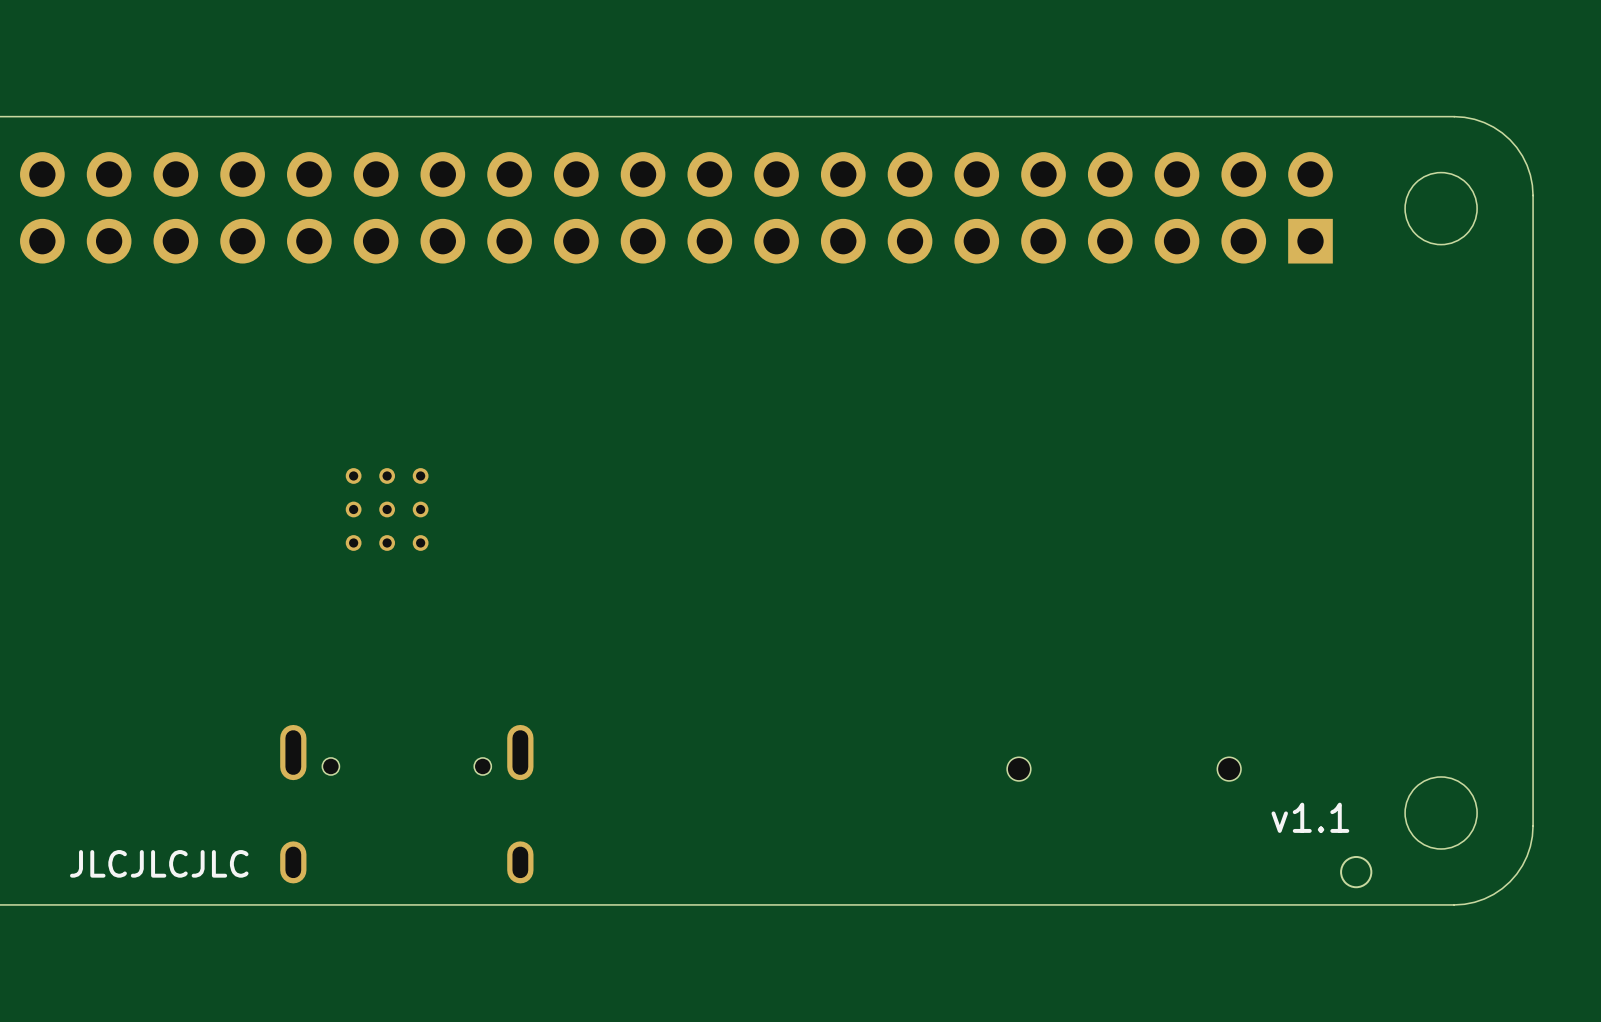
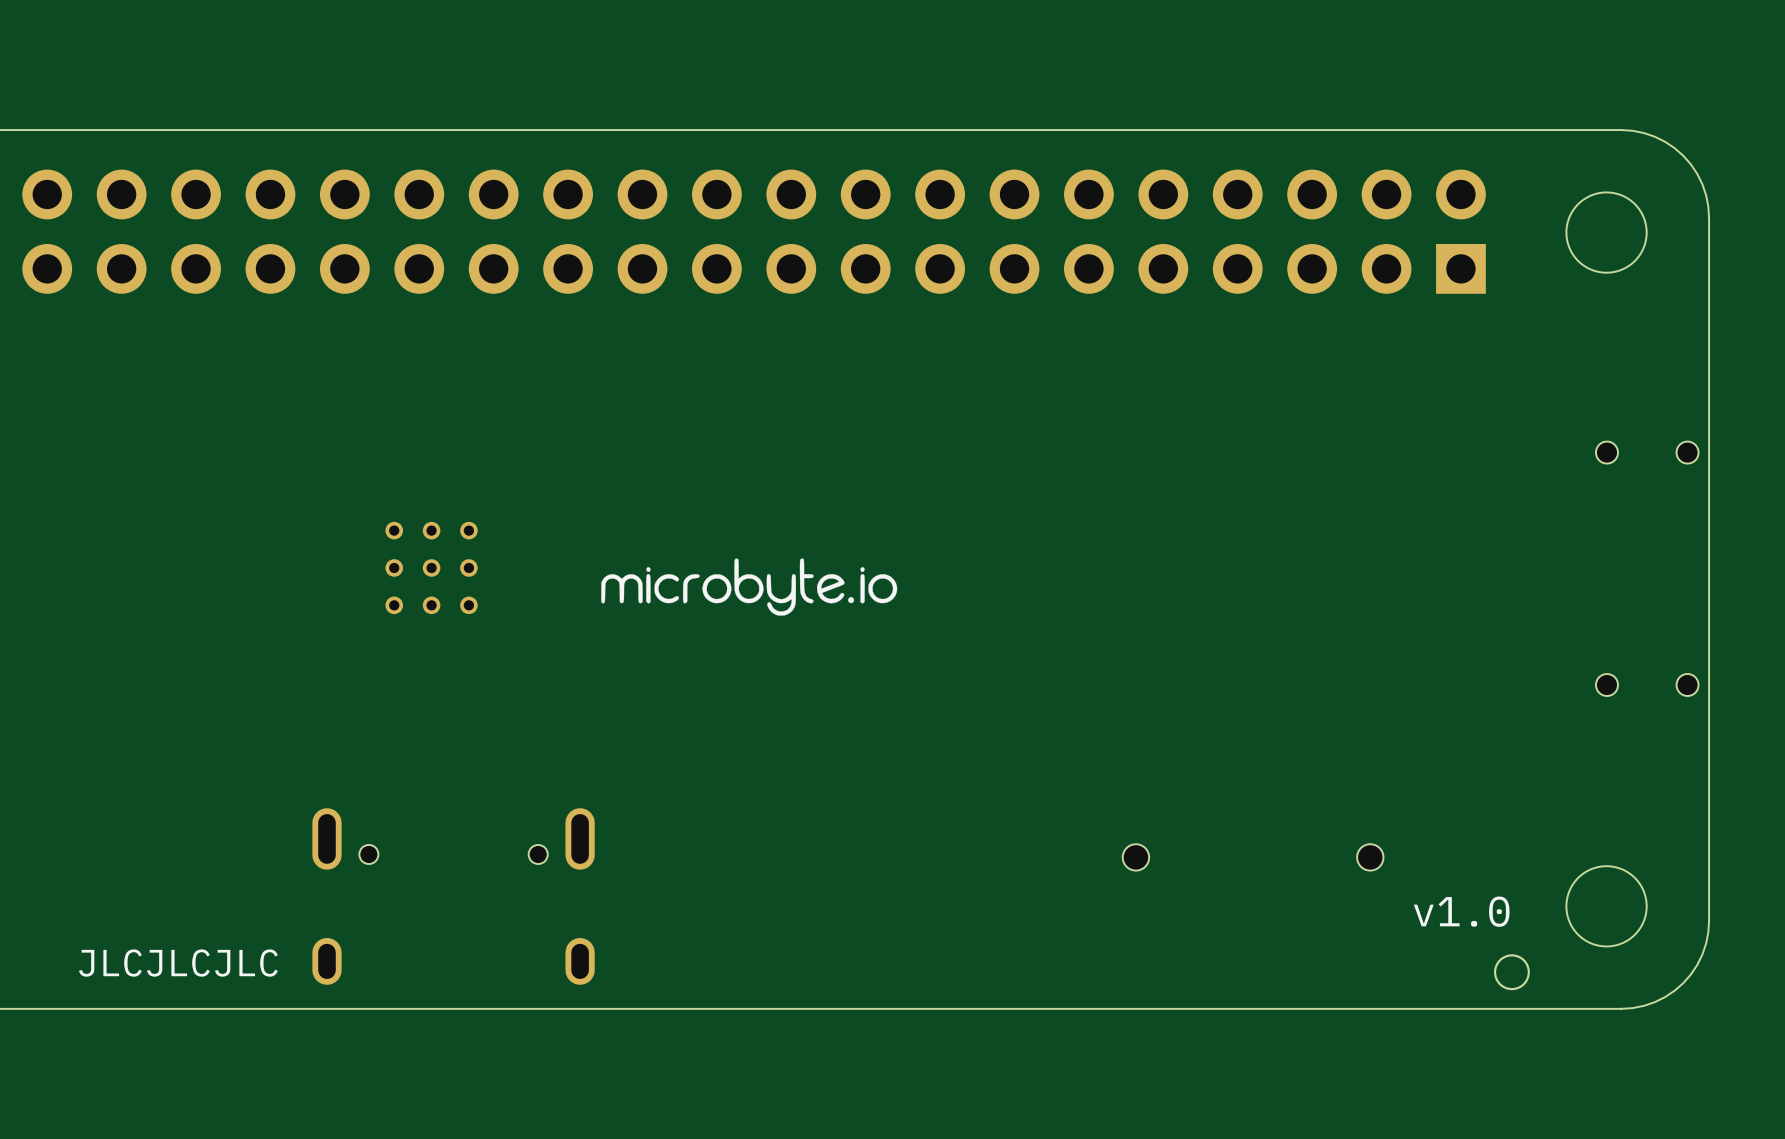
part: none -> (1647, 452)
drawing: none -> [601, 558, 898, 616]
part: none -> (1647, 685)
text: v1.1 (1310, 817) -> v1.0 (1461, 911)

